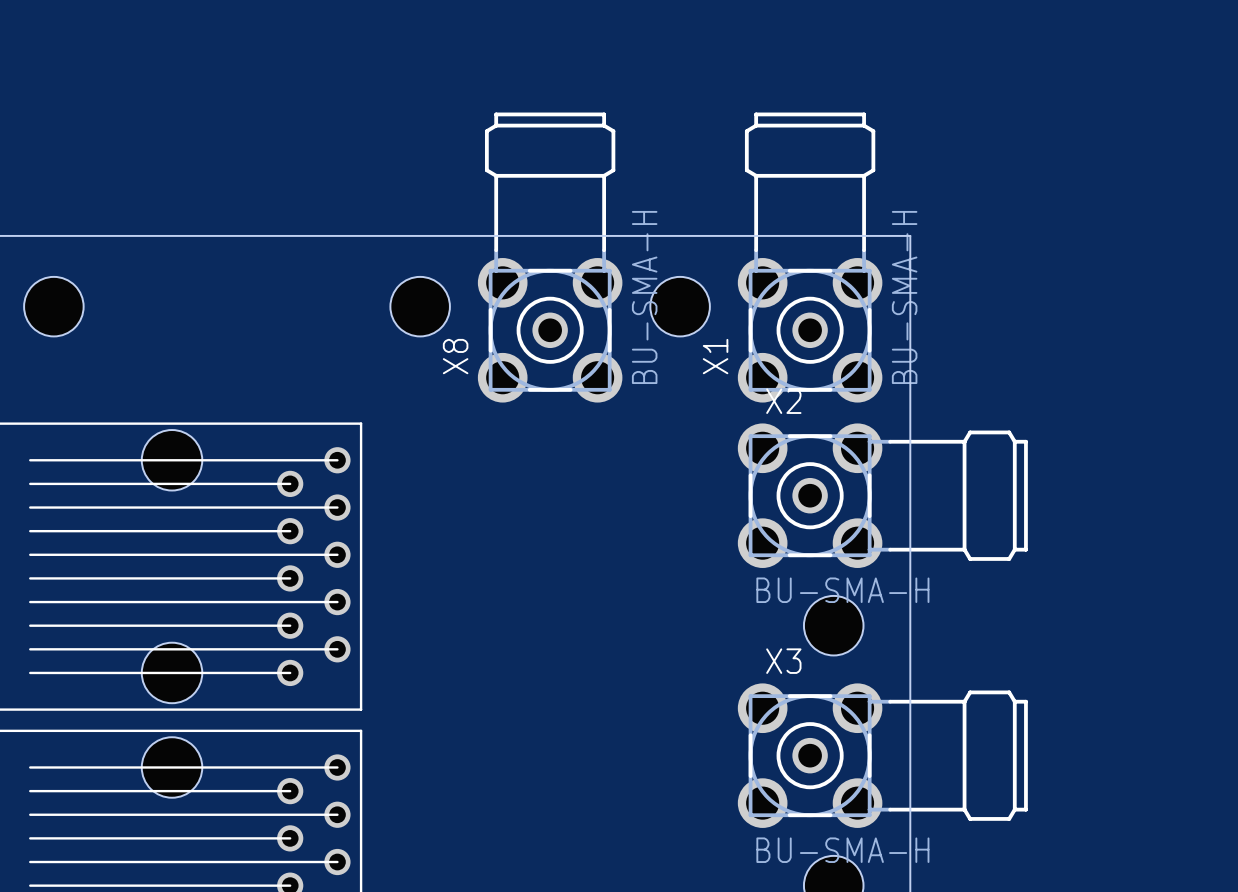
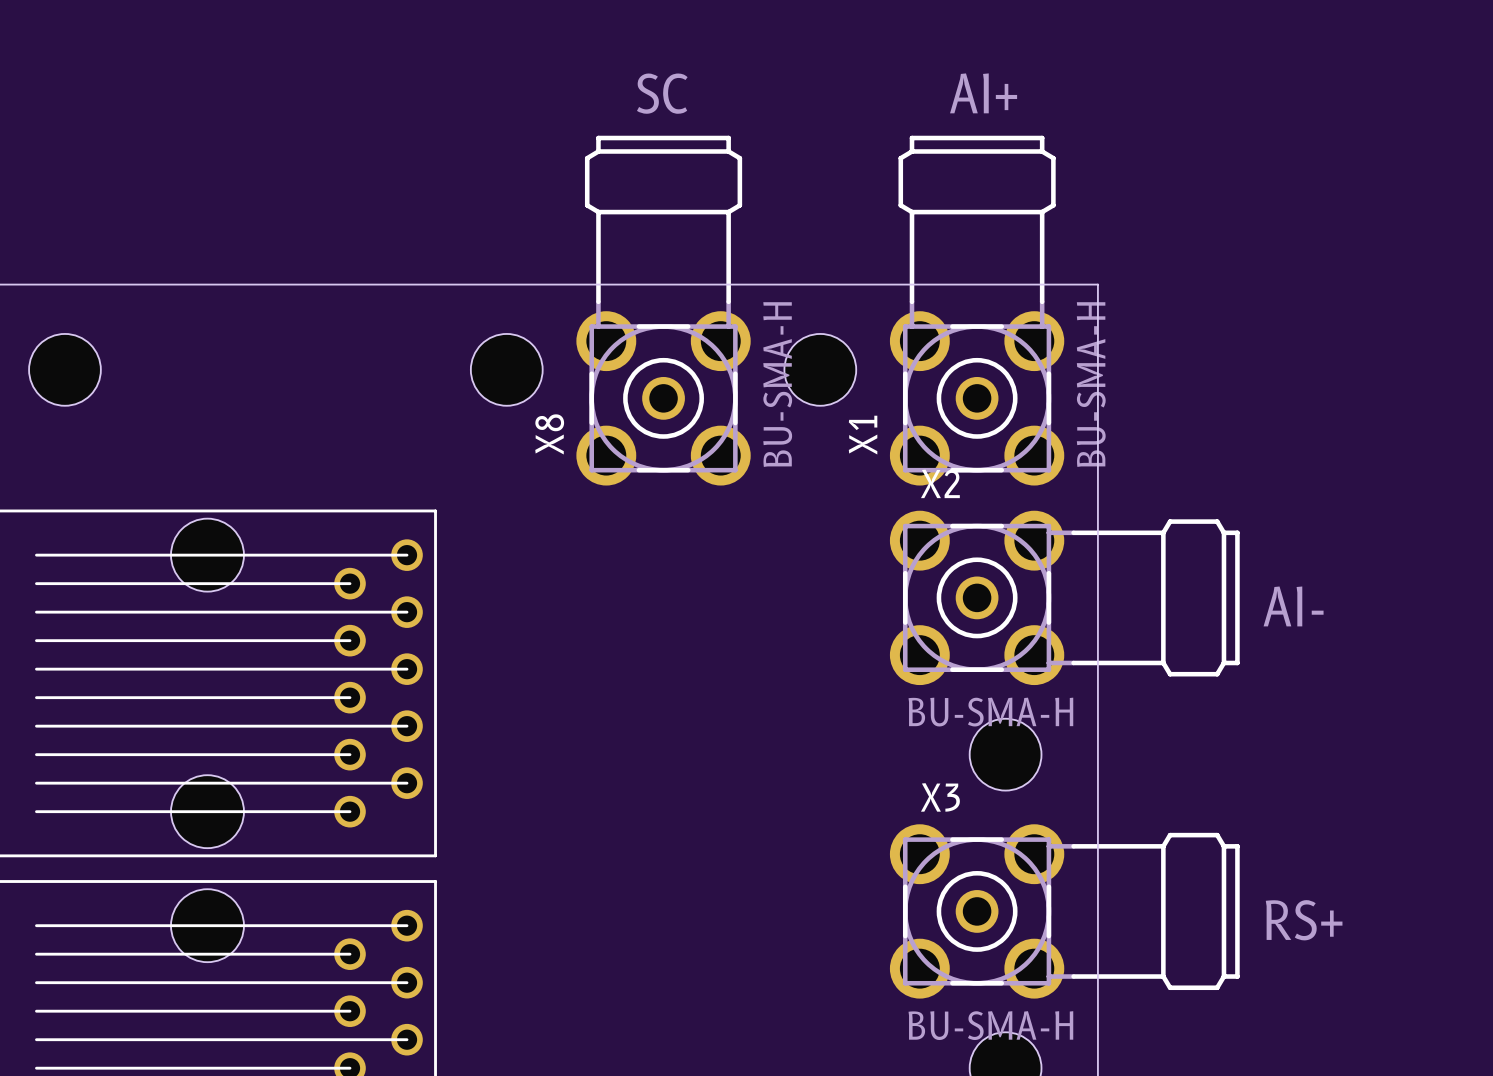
text: none -> SC (662, 93)
text: none -> AI+ (983, 93)
text: none -> AI- (1293, 606)
text: none -> RS+ (1304, 920)

